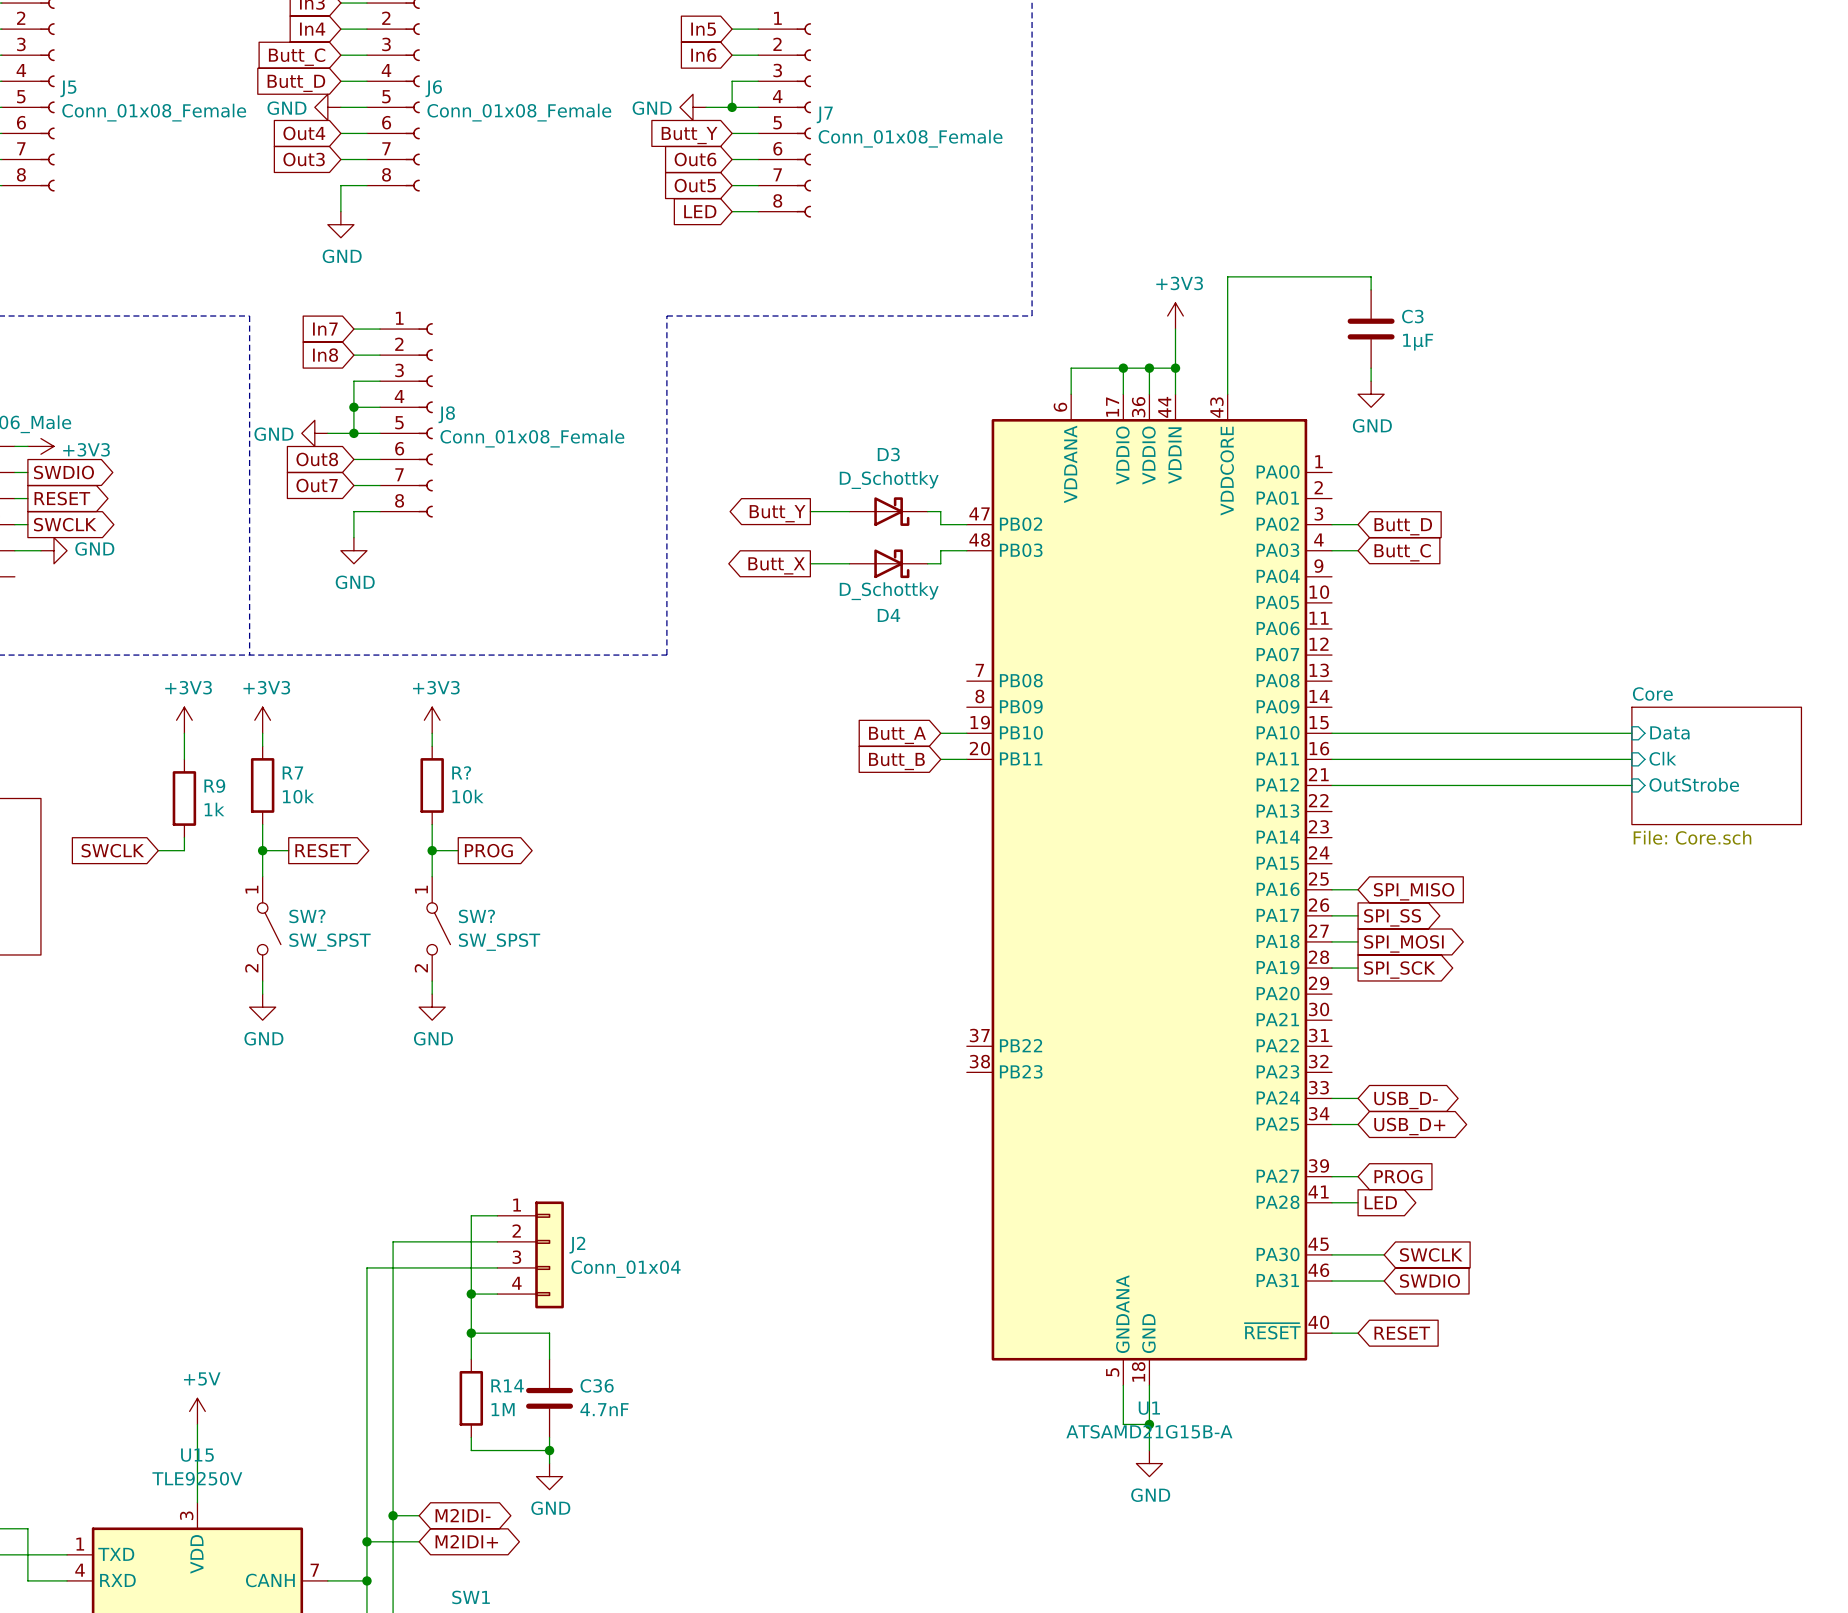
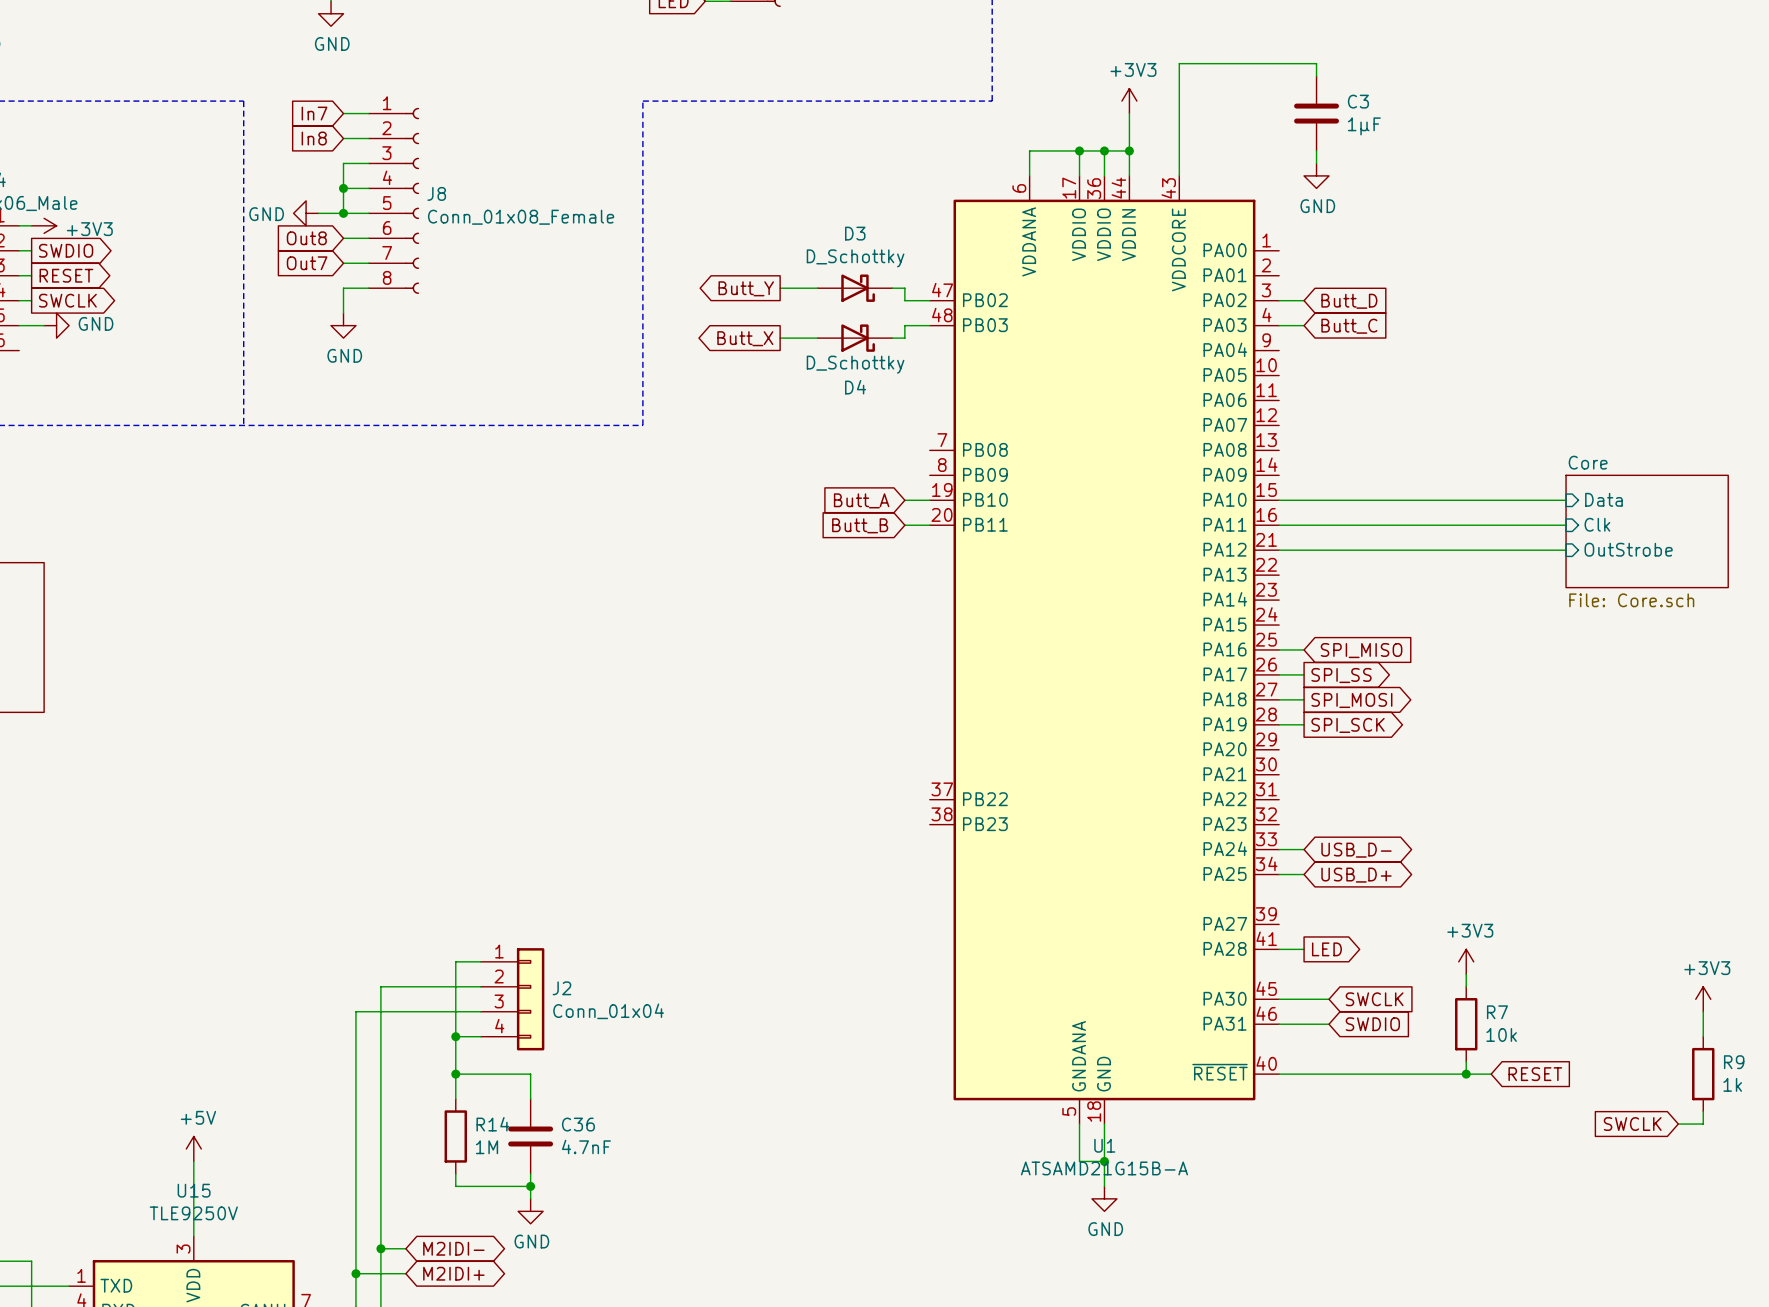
power symbol: +3V3 (184, 720) -> none
power symbol: +3V3 (262, 720) -> none
power symbol: +3V3 (432, 720) -> none
wire: (184, 733) (184, 759) -> none
wire: (262, 733) (262, 746) -> none
wire: (432, 733) (432, 746) -> none
R7 position: (262, 785) -> (1466, 1024)
R?: 10k (432, 785) -> none
R9 position: (184, 798) -> (1703, 1074)
wire: (262, 824) (262, 876) -> none
wire: (432, 824) (432, 876) -> none
wire: (184, 837) (184, 850) (158, 850) -> none
global label: SWCLK (112, 850) -> none
wire: (262, 850) (288, 850) -> none
junction: (262, 850) -> none
global label: RESET (323, 850) -> none
wire: (432, 850) (458, 850) -> none
junction: (432, 850) -> none
global label: PROG (488, 850) -> none
SW?: SW_SPST (269, 928) -> none
SW?: SW_SPST (438, 928) -> none
wire: (262, 981) (262, 994) -> none
wire: (432, 981) (432, 994) -> none
power symbol: GND (262, 1007) -> none
power symbol: GND (432, 1007) -> none
wire: (1331, 1176) (1358, 1176) -> none
global label: PROG (1398, 1176) -> none
power symbol: none -> +3V3 (1466, 961)
wire: none -> (1466, 974) (1466, 986)
power symbol: none -> +3V3 (1703, 999)
wire: none -> (1703, 1011) (1703, 1036)
wire: none -> (1466, 1061) (1466, 1074)
wire: none -> (1304, 1074) (1491, 1074)
global label position: RESET (1402, 1333) -> RESET (1535, 1074)
junction: none -> (1466, 1074)
wire: none -> (1703, 1111) (1703, 1124) (1678, 1124)
global label: none -> SWCLK (1632, 1124)

